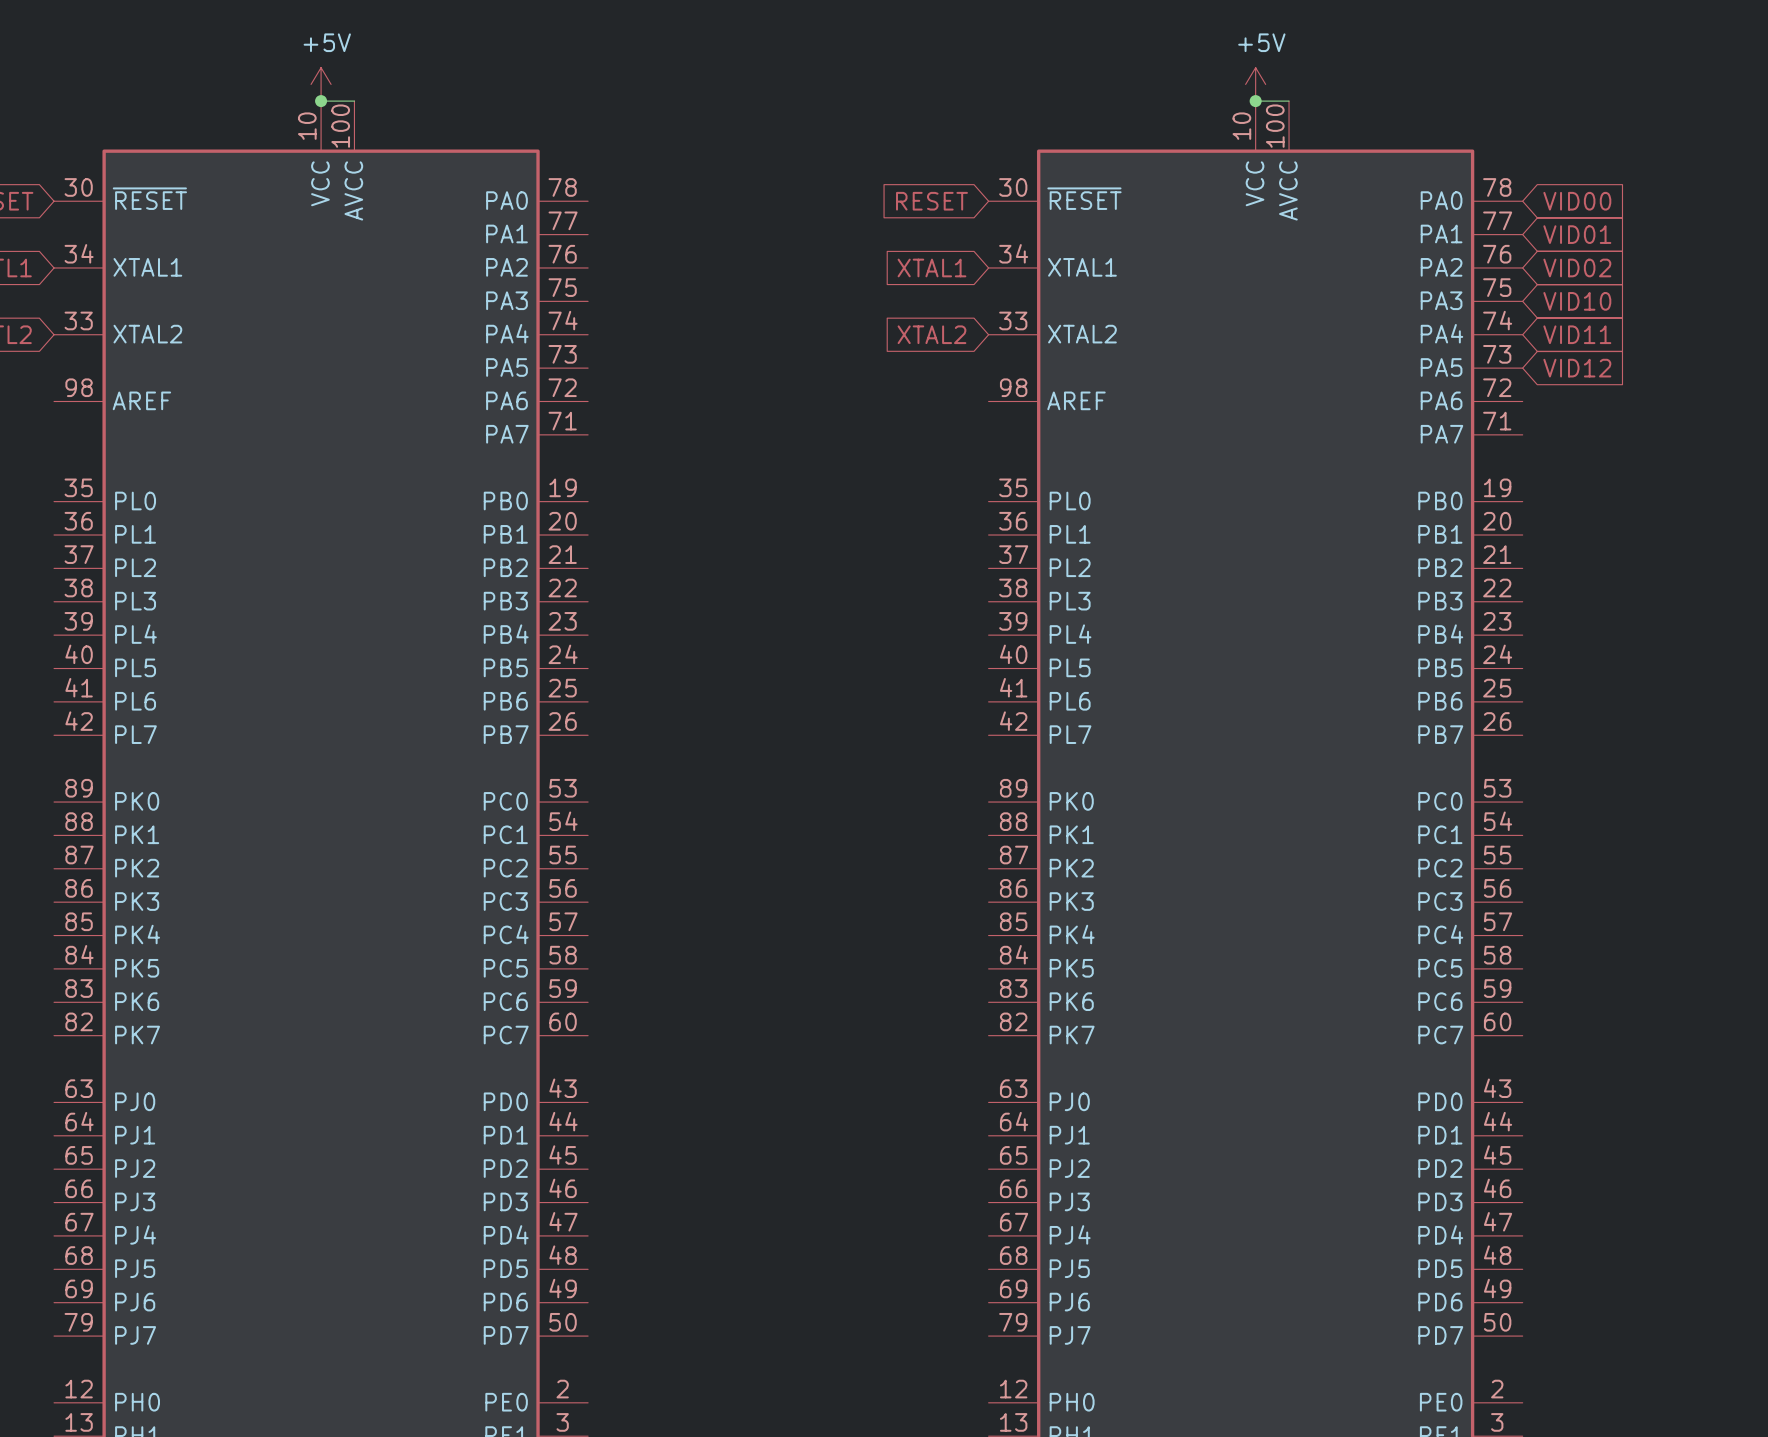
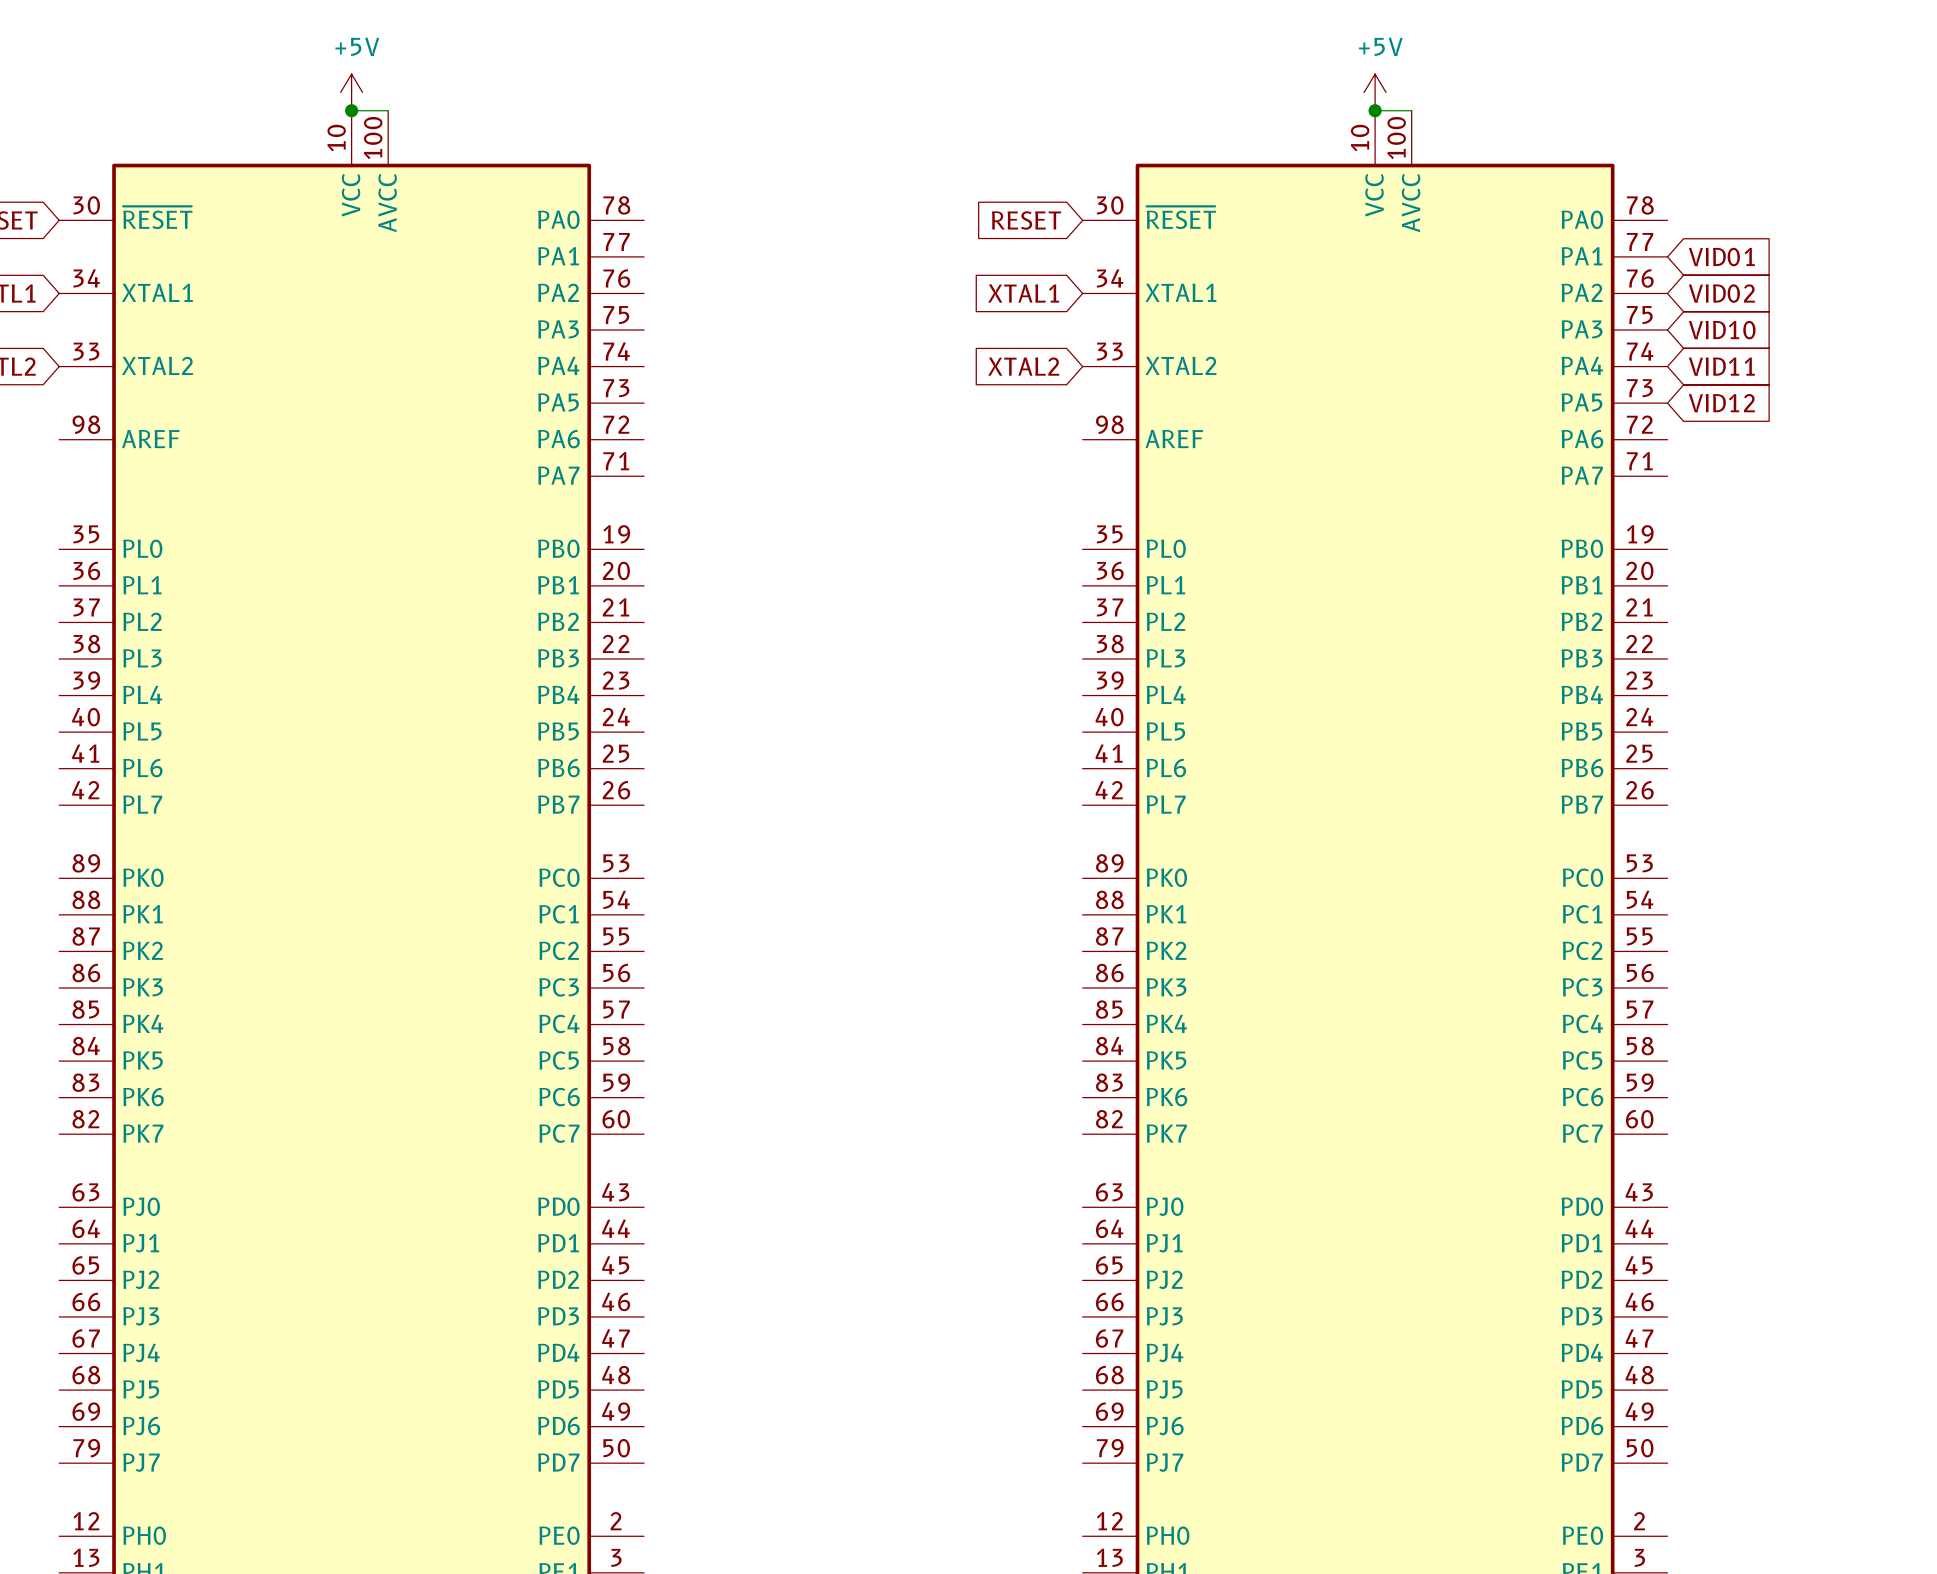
global label: VID00 (1577, 201) -> none

